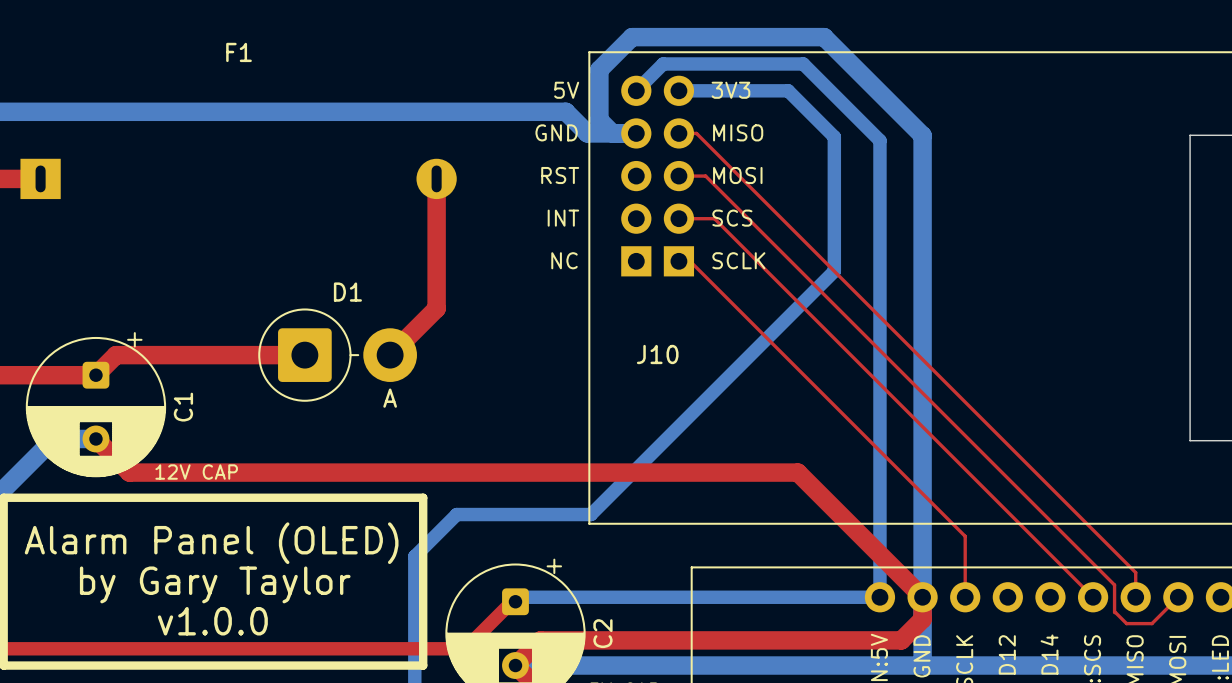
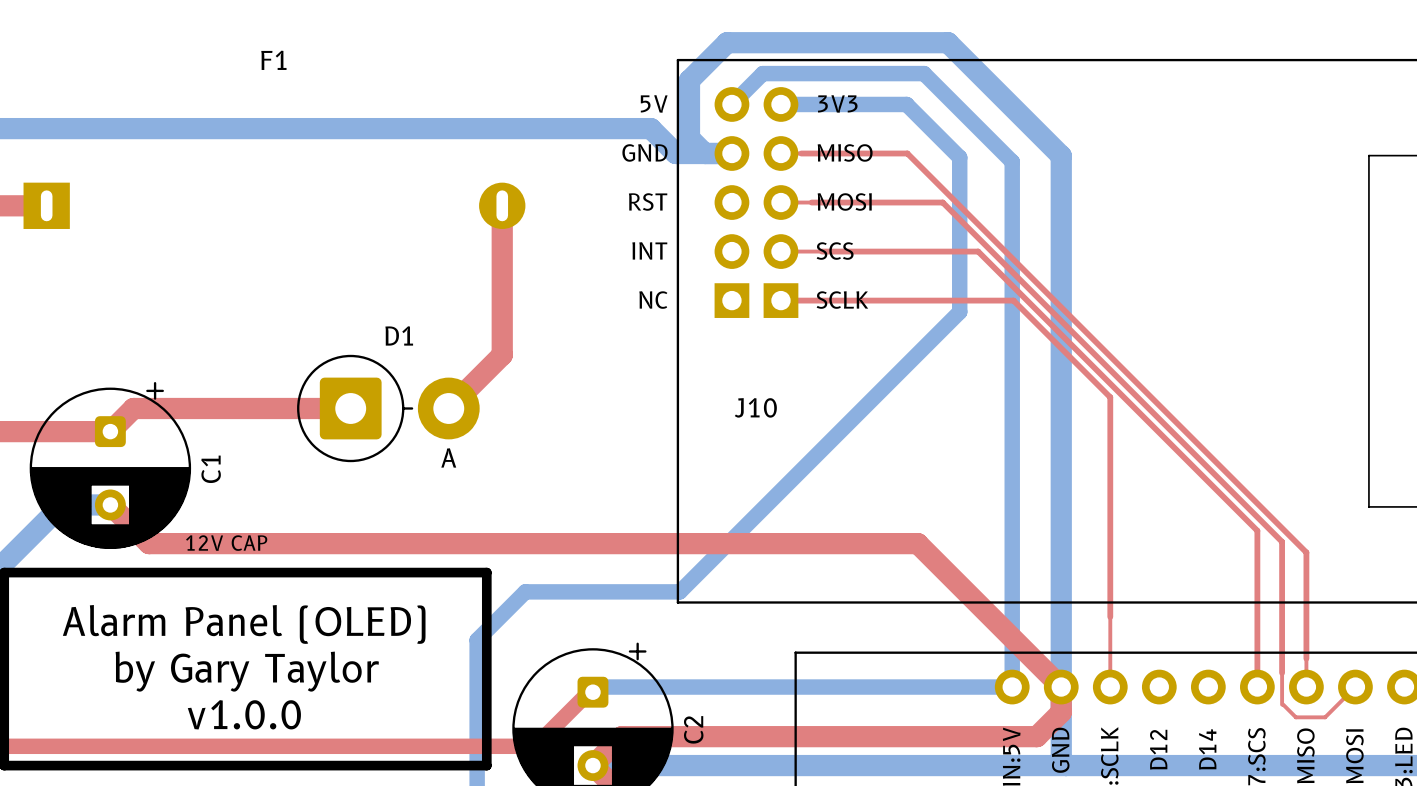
top track: (696, 133) (1135, 572) -> (801, 153) (907, 153) (1306, 552) (1306, 658)
top track: (705, 176) (1114, 585) -> (811, 202) (942, 202) (1282, 541) (1282, 672)
top track: (714, 218) (1093, 597) -> (821, 251) (978, 251) (1257, 530) (1257, 687)
top track: (690, 261) (965, 536) -> (793, 300) (1013, 300) (1110, 397) (1110, 616)

